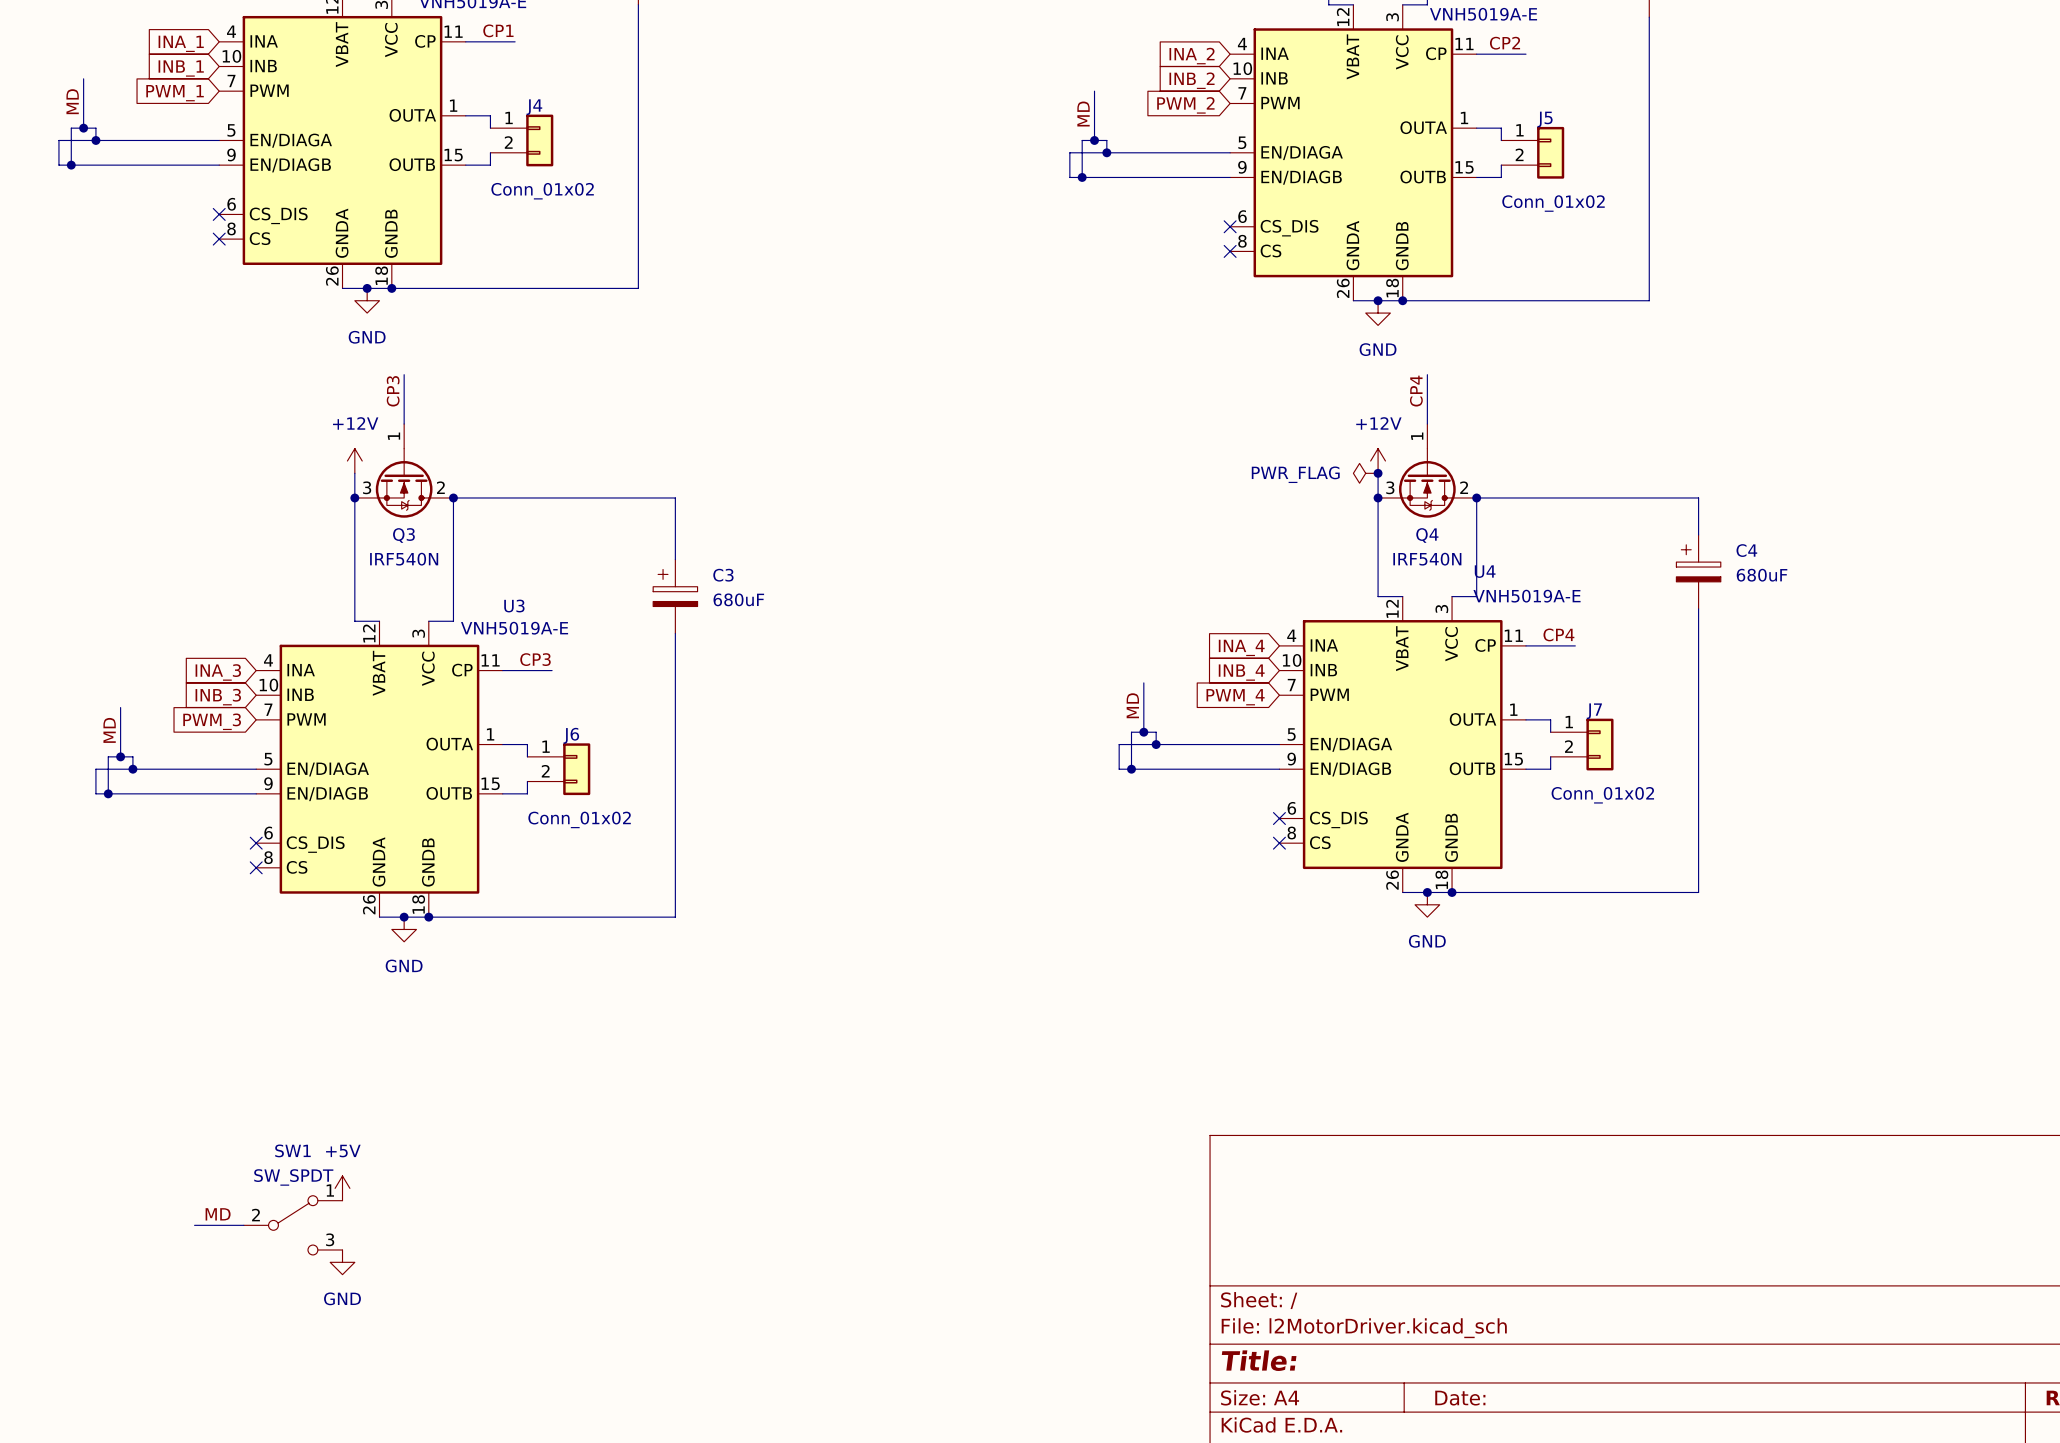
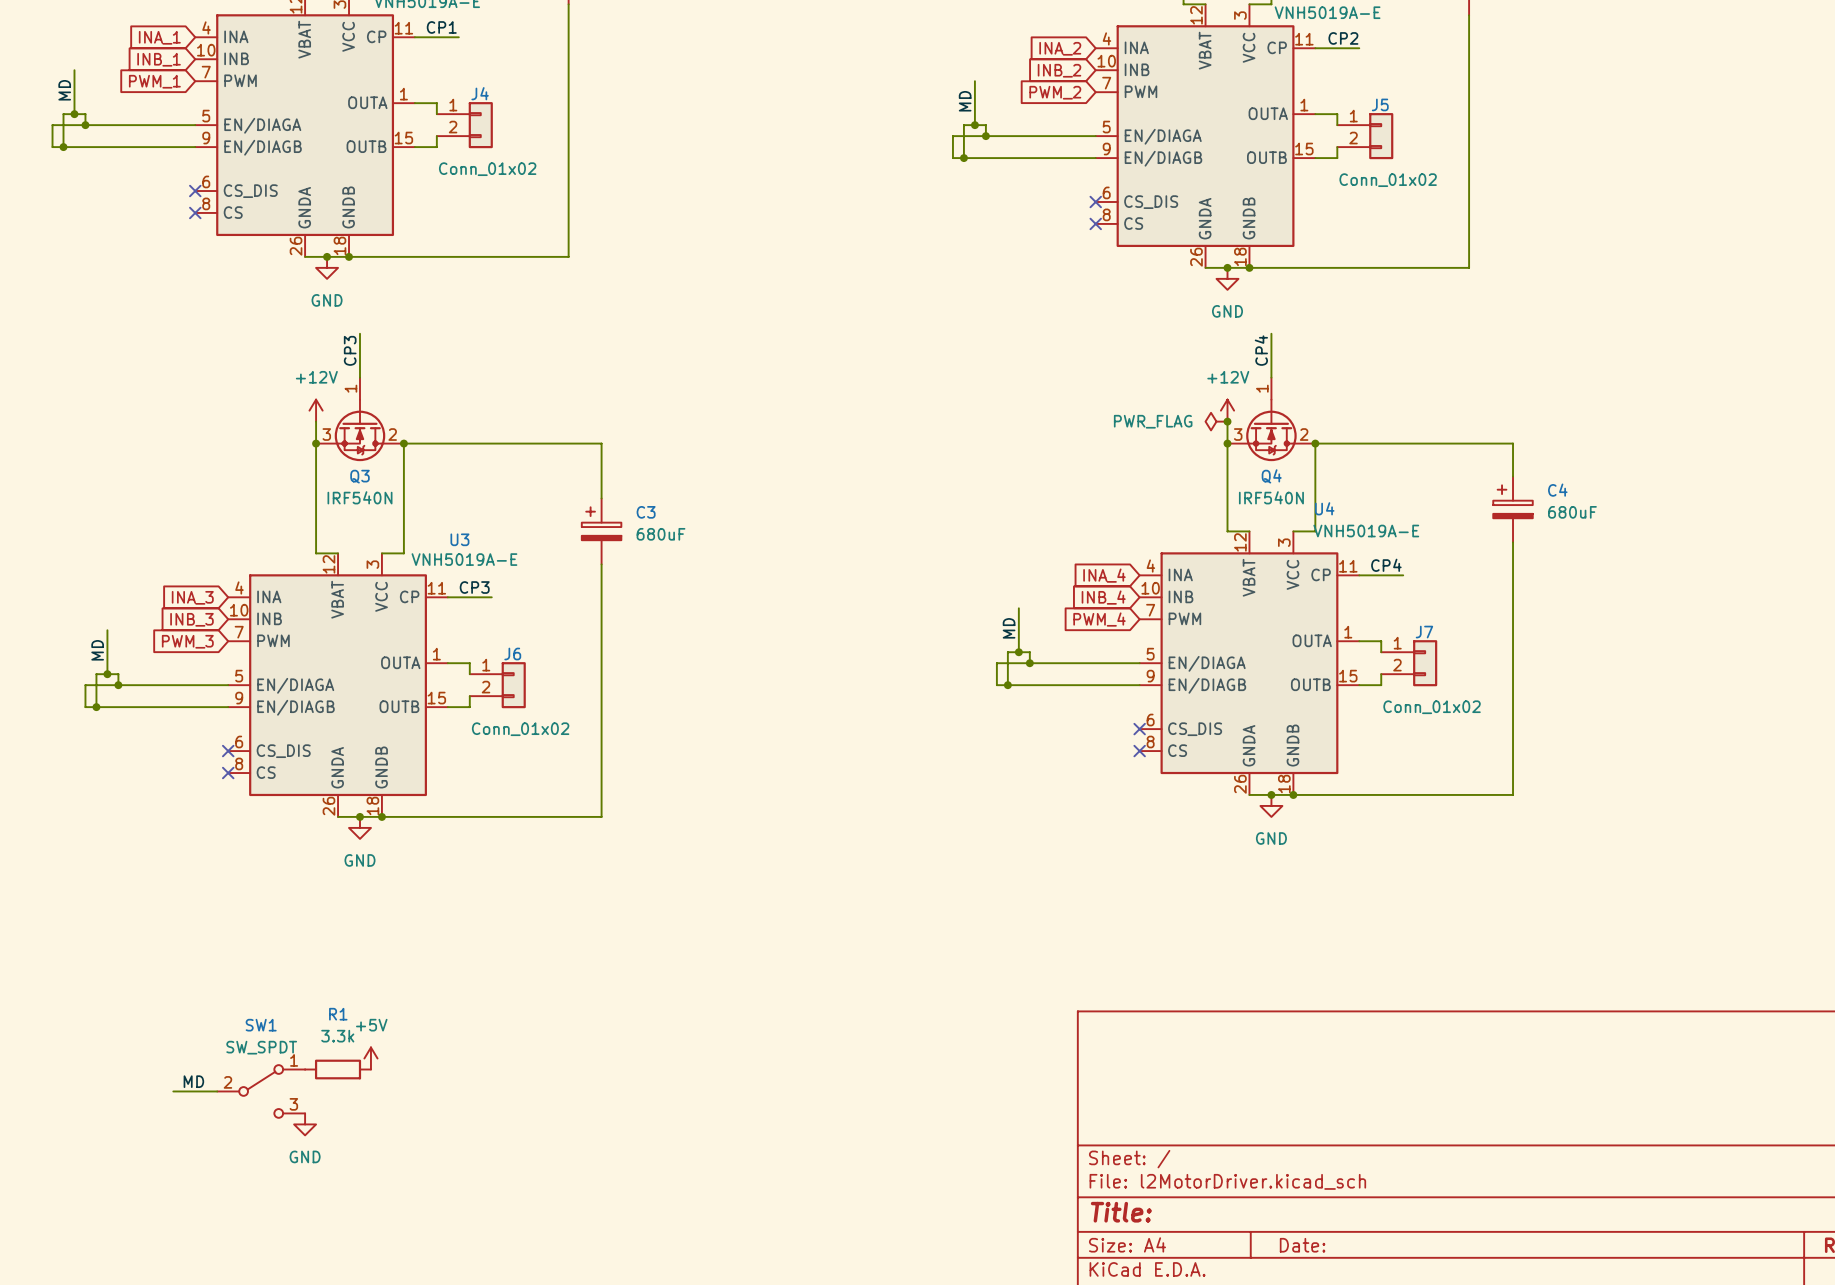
power symbol position: +5V (342, 1188) -> +5V (370, 1058)
R1: none -> 3.3k (338, 1069)

